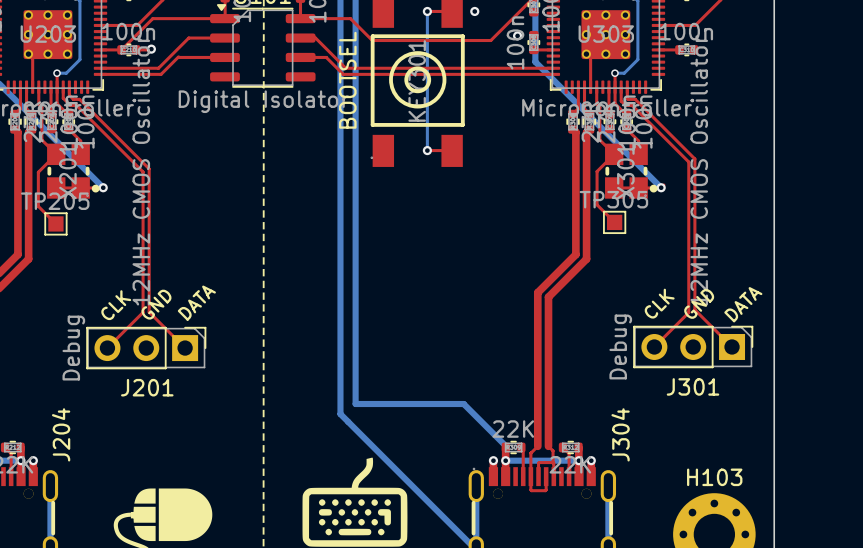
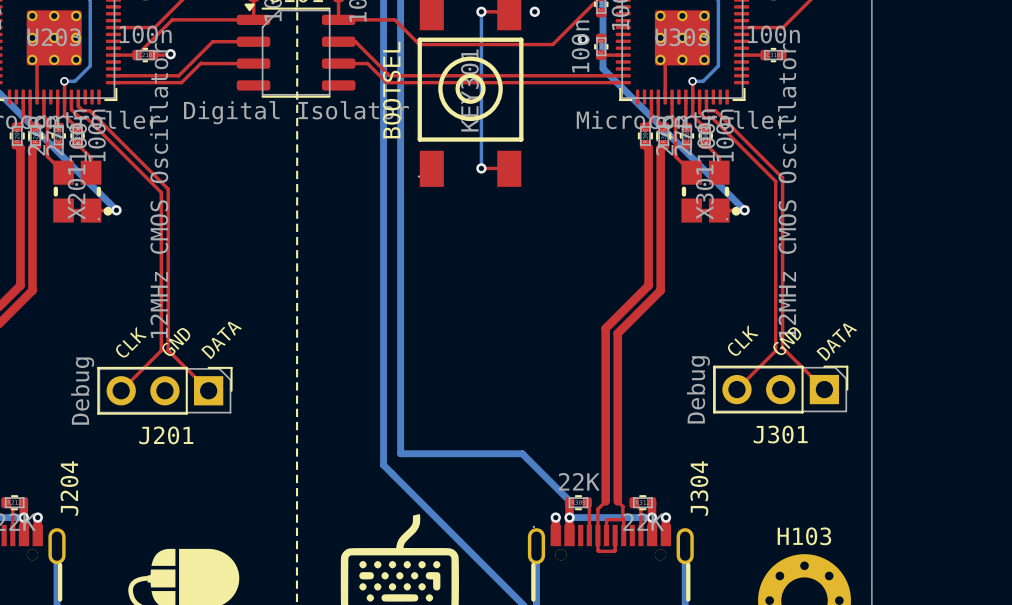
top track: (56, 154) (38, 172) (38, 206) (55, 223) -> none
top track: (614, 154) (597, 171) (597, 204) (614, 222) -> none
TP305: (614, 222) -> none
TP205: (55, 223) -> none

